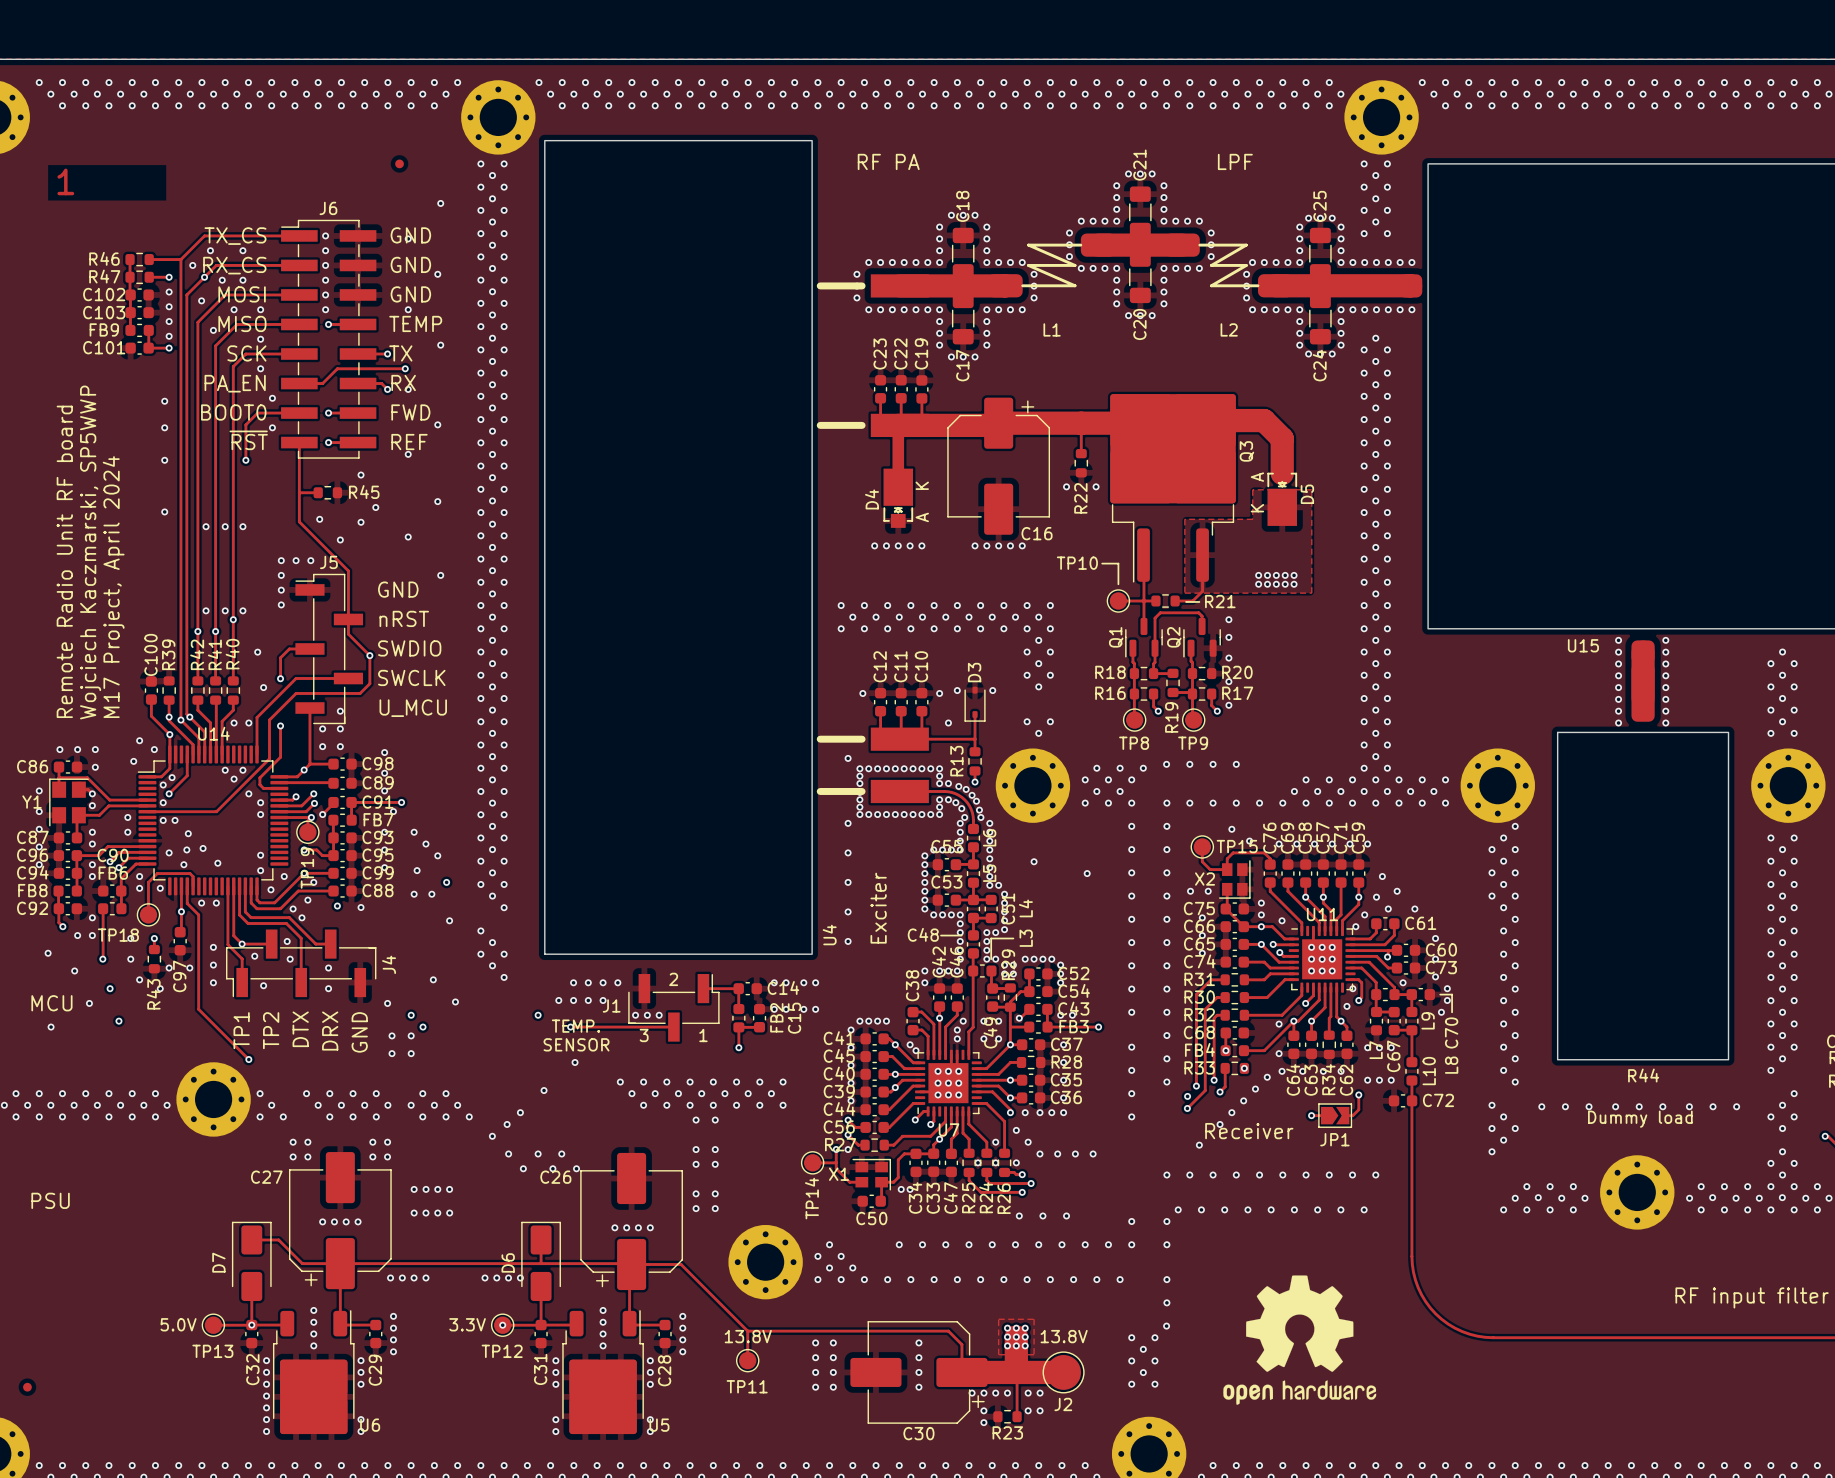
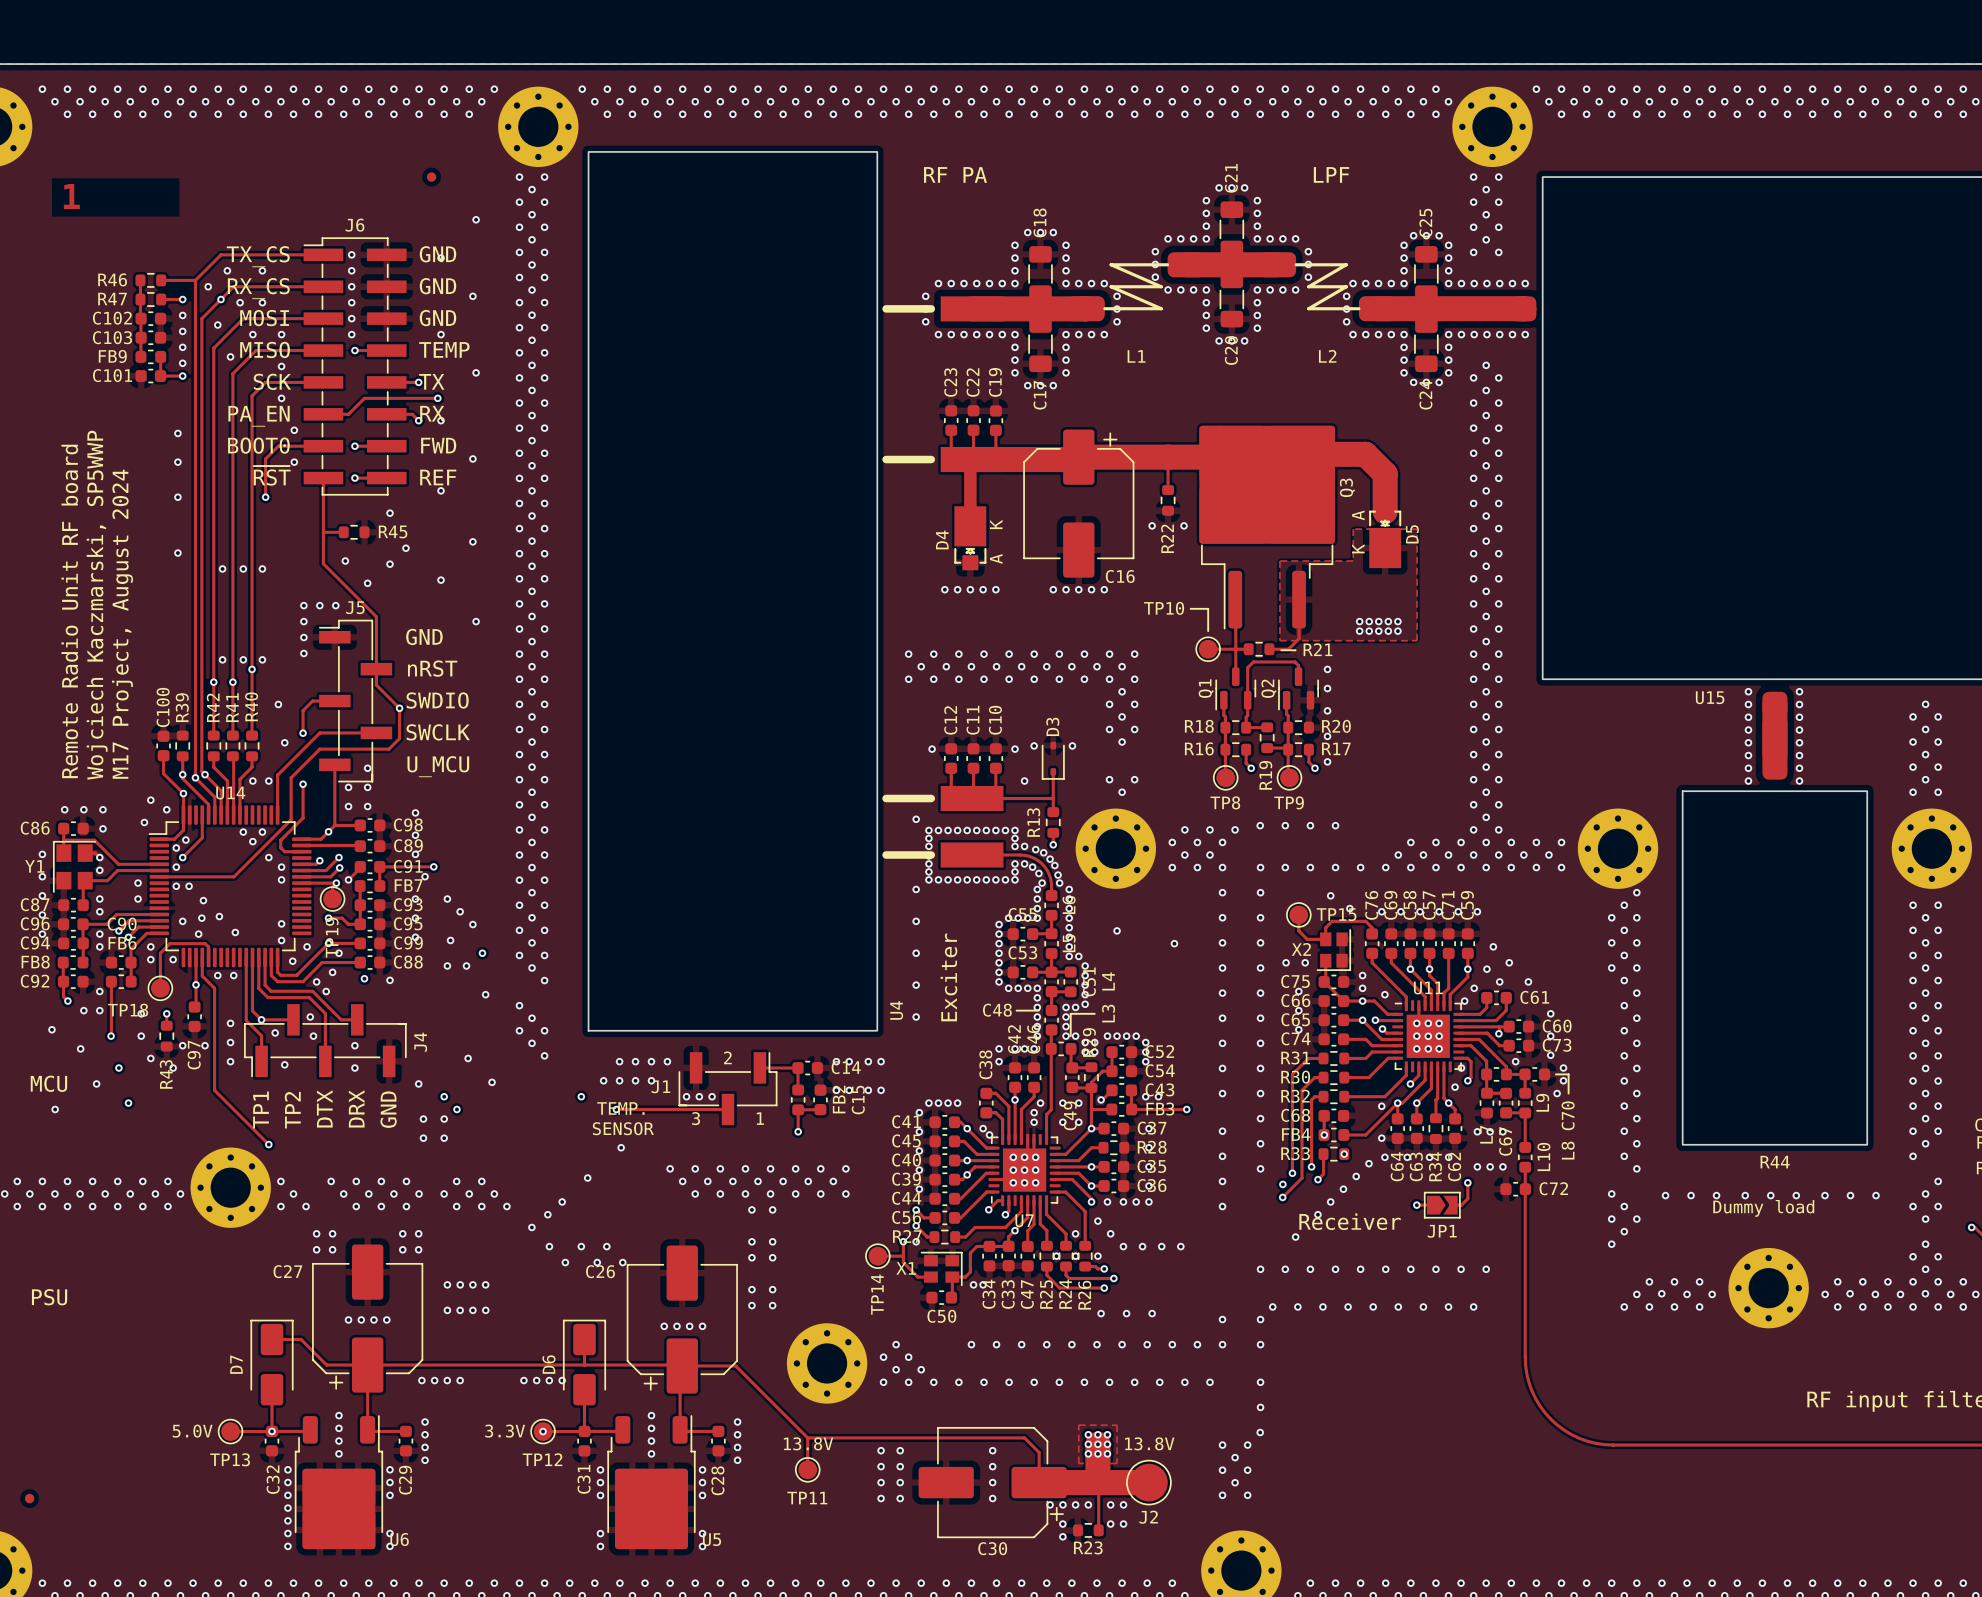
text: M17 Project, April 2024 (113, 587) -> M17 Project, August 2024 (122, 624)
drawing: [1223, 1275, 1377, 1405] -> none

